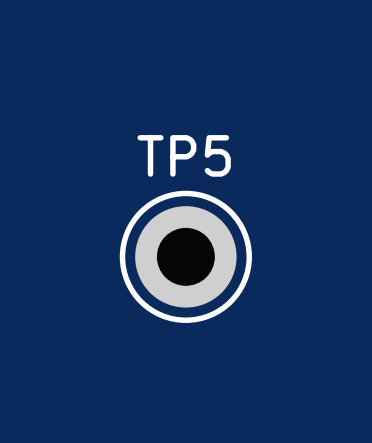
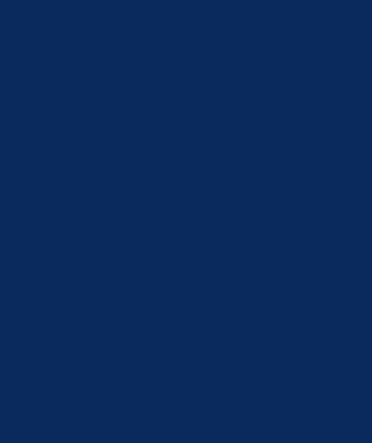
TP5: (185, 256) -> none

